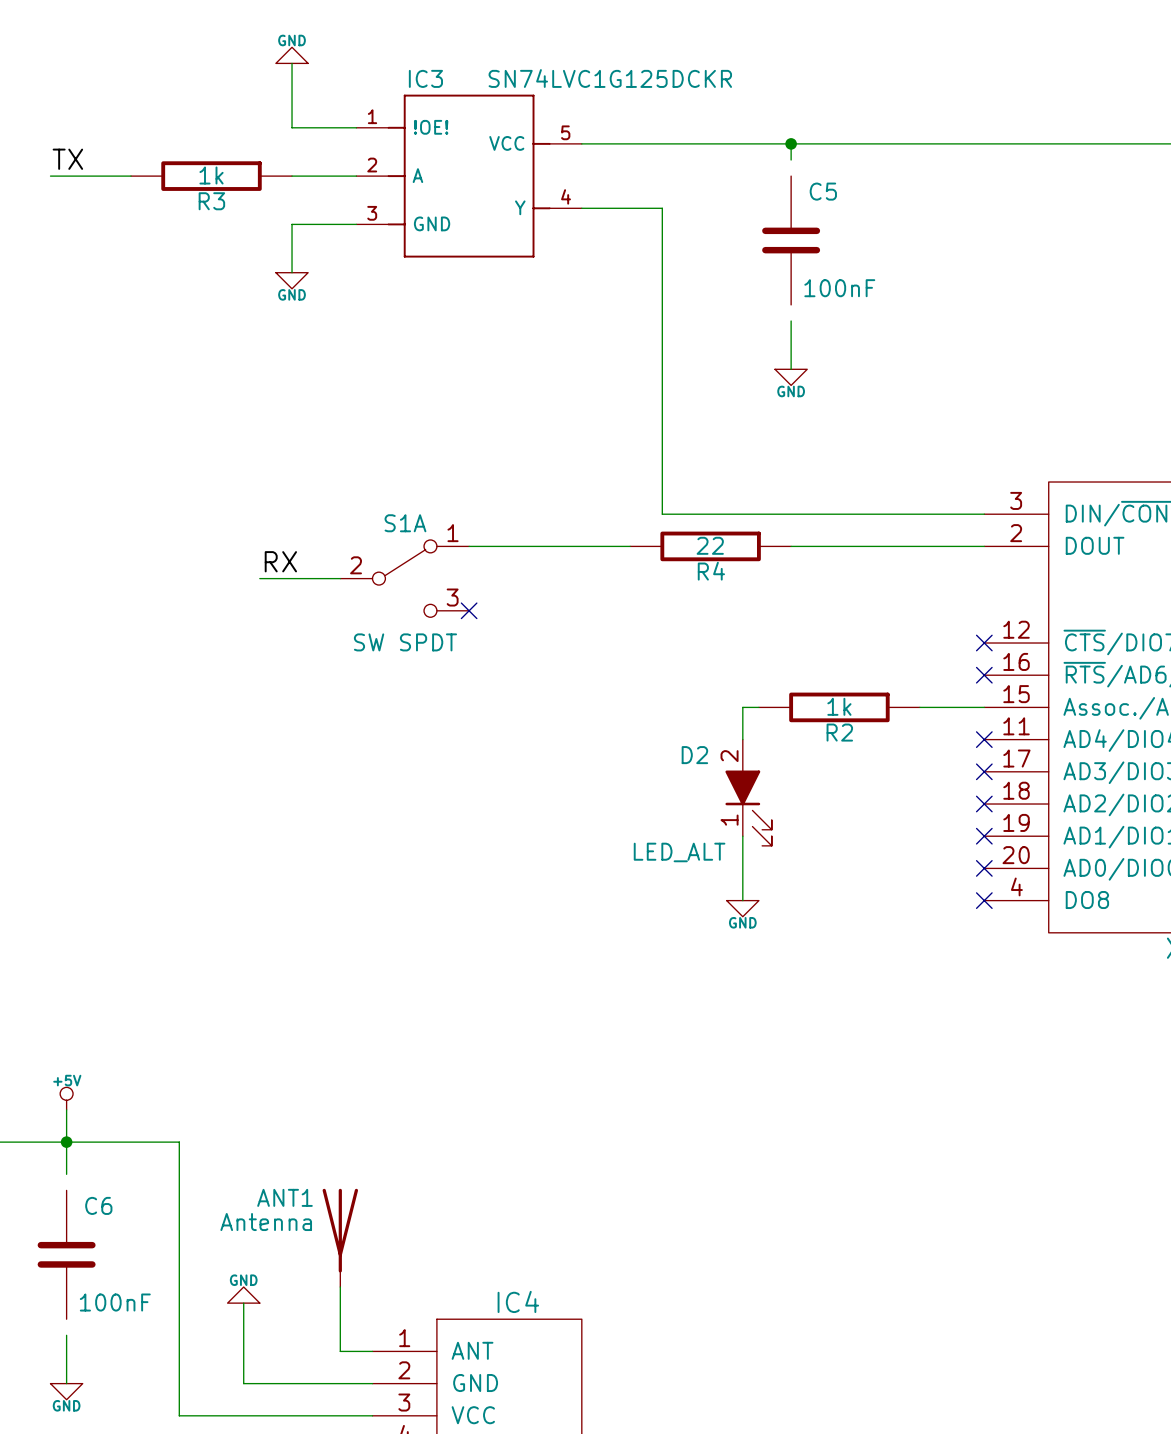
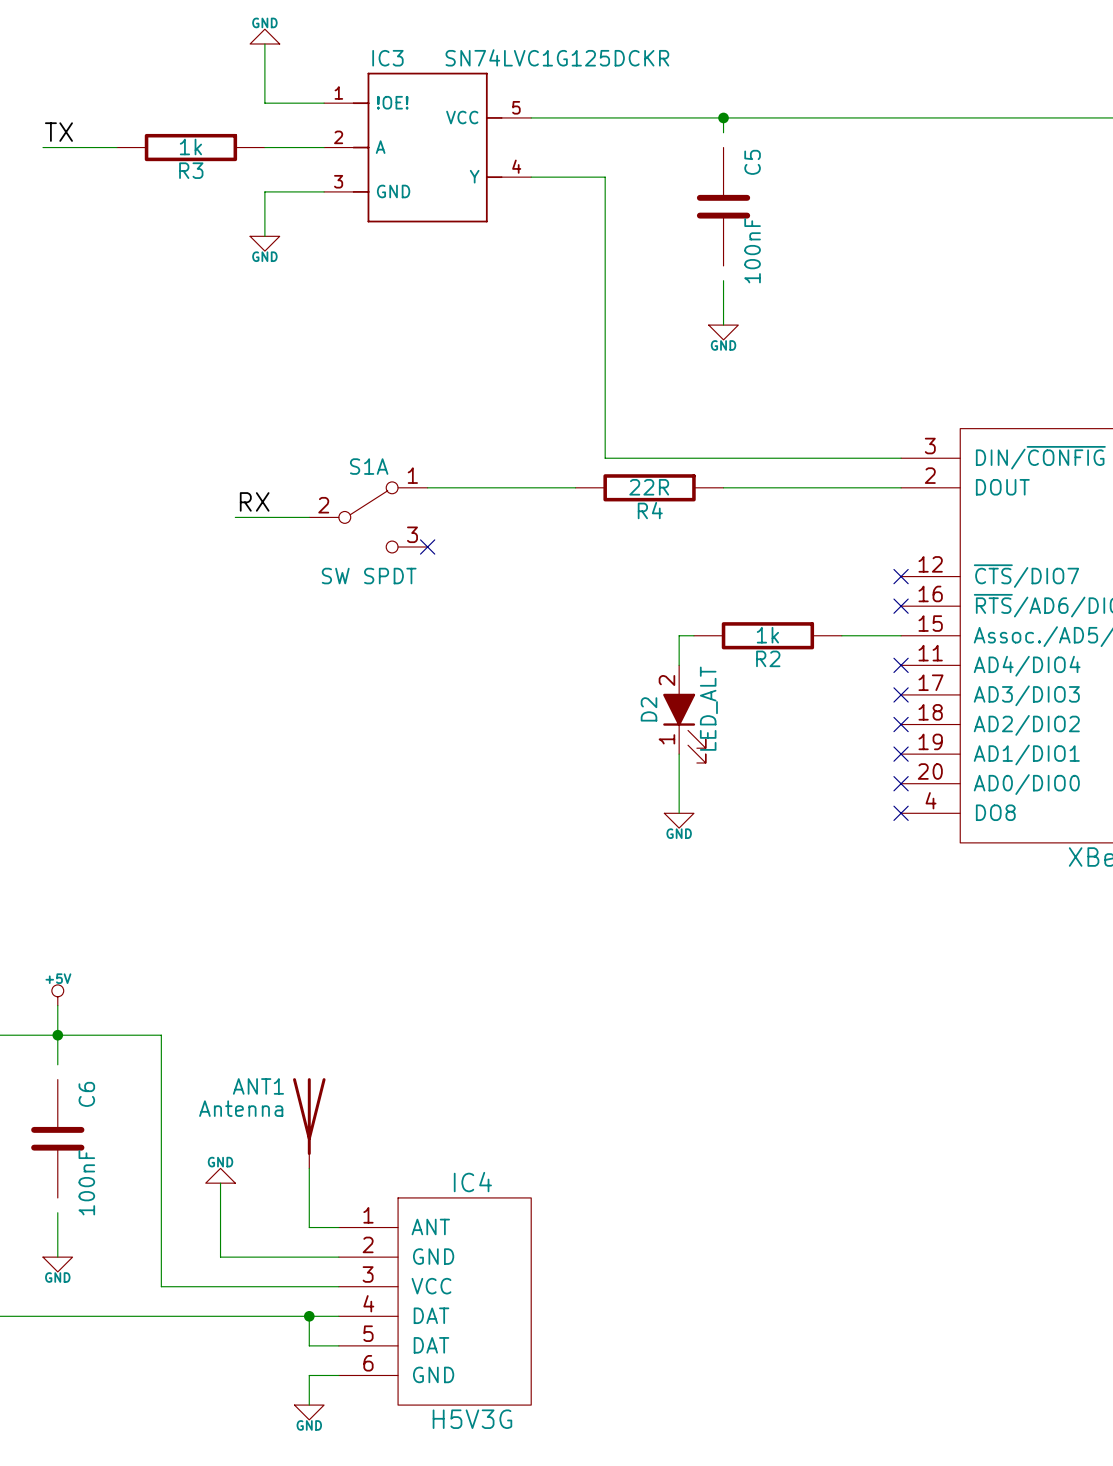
C5 name rotation: 0° (823, 191) -> 90° counterclockwise (752, 162)
C5 value rotation: 0° (839, 288) -> 90° counterclockwise (752, 250)
R4 value: 22 (710, 545) -> 22R (649, 487)
D2 name rotation: 0° (694, 755) -> 90° counterclockwise (649, 709)
D2 value rotation: 0° (679, 852) -> 90° counterclockwise (708, 708)
D2 value position: LED_ALT (679, 852) -> LED_ALT (708, 708)
C6 name rotation: 0° (98, 1205) -> 90° counterclockwise (86, 1094)
C6 value rotation: 0° (115, 1302) -> 90° counterclockwise (86, 1182)

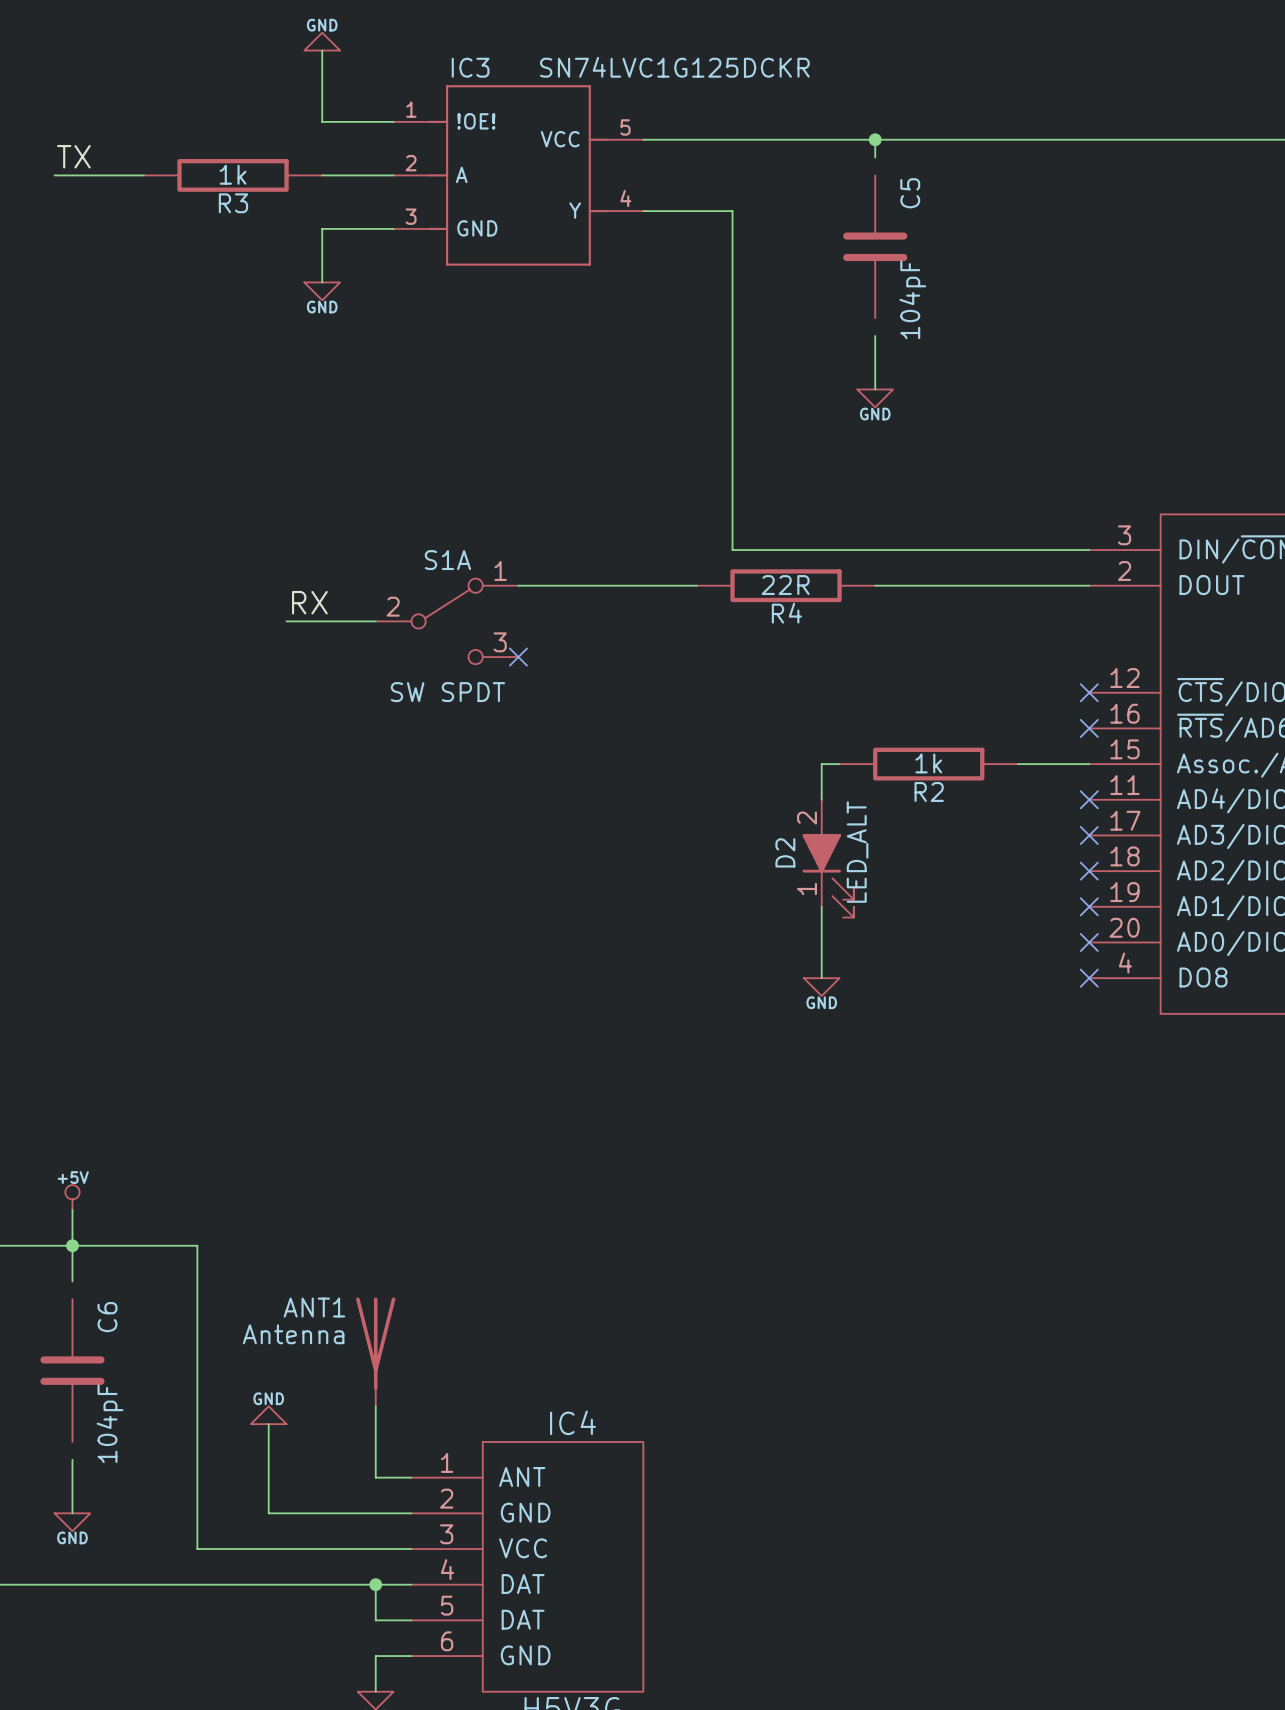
C5 value: 100nF (752, 250) -> 104pF (912, 299)
C6 value: 100nF (86, 1182) -> 104pF (110, 1423)

